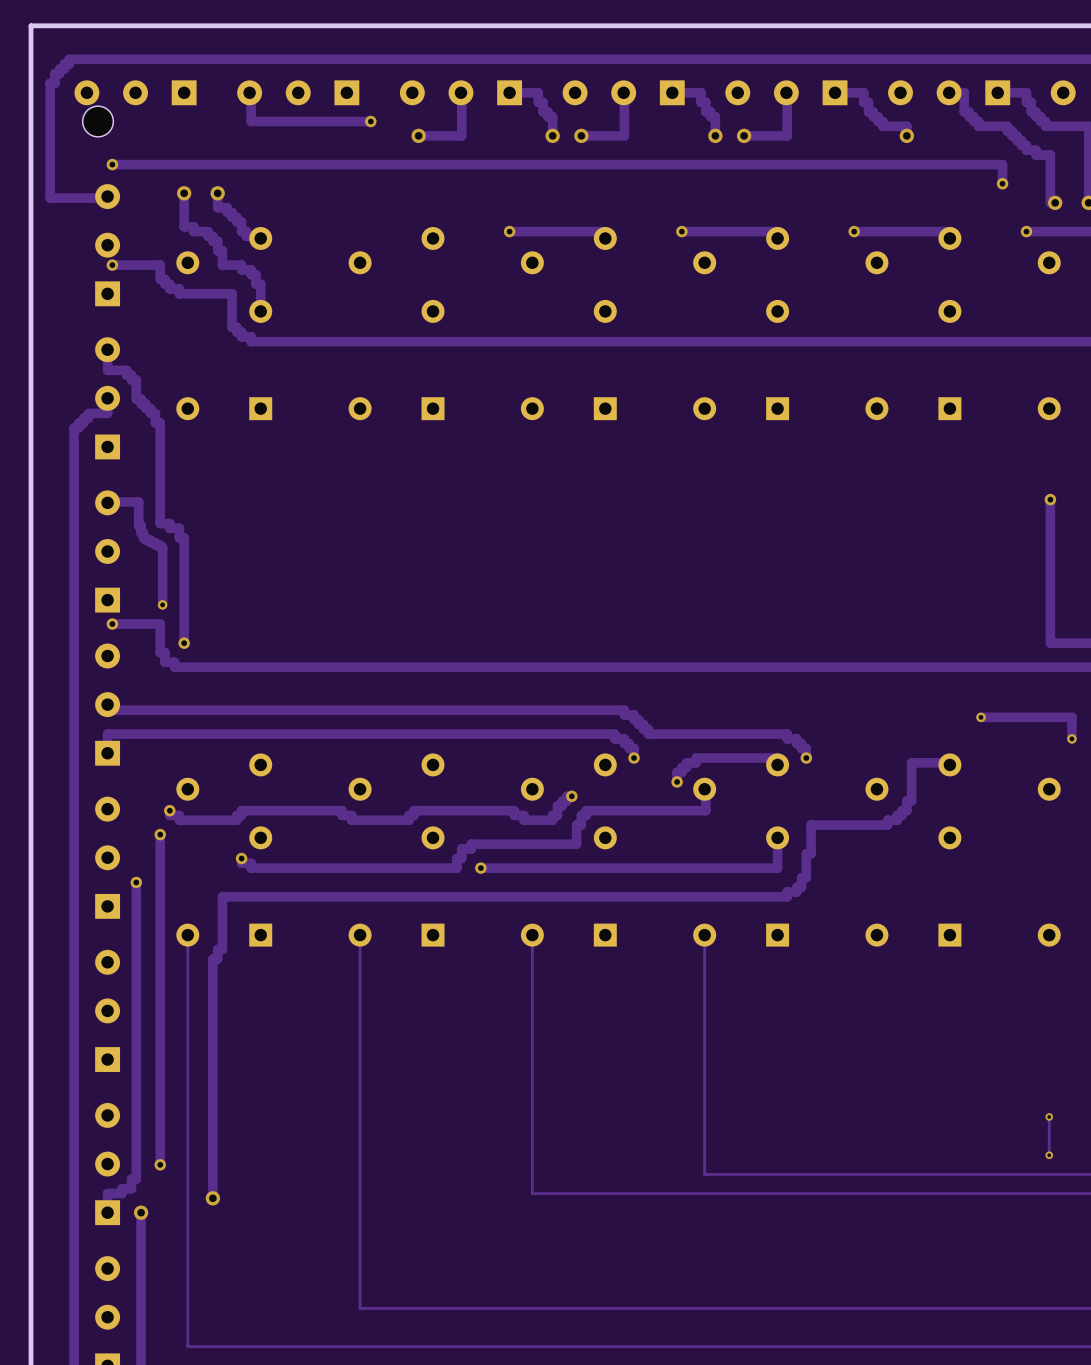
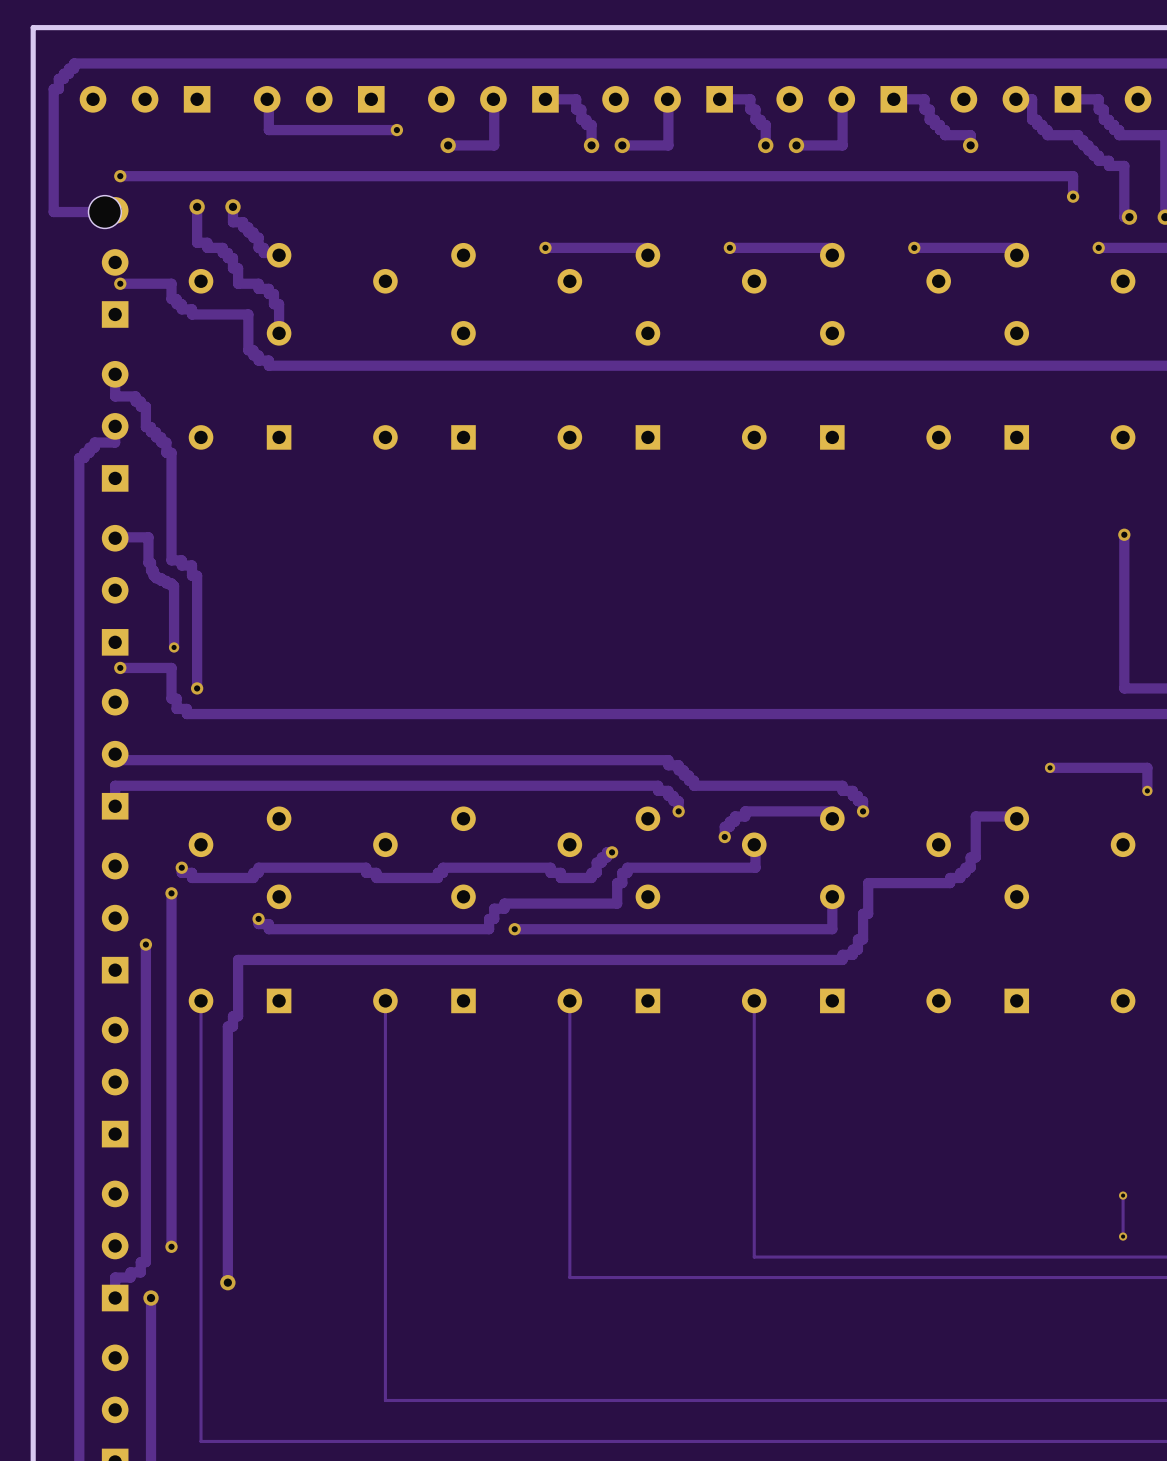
part position: (98, 121) -> (104, 212)

